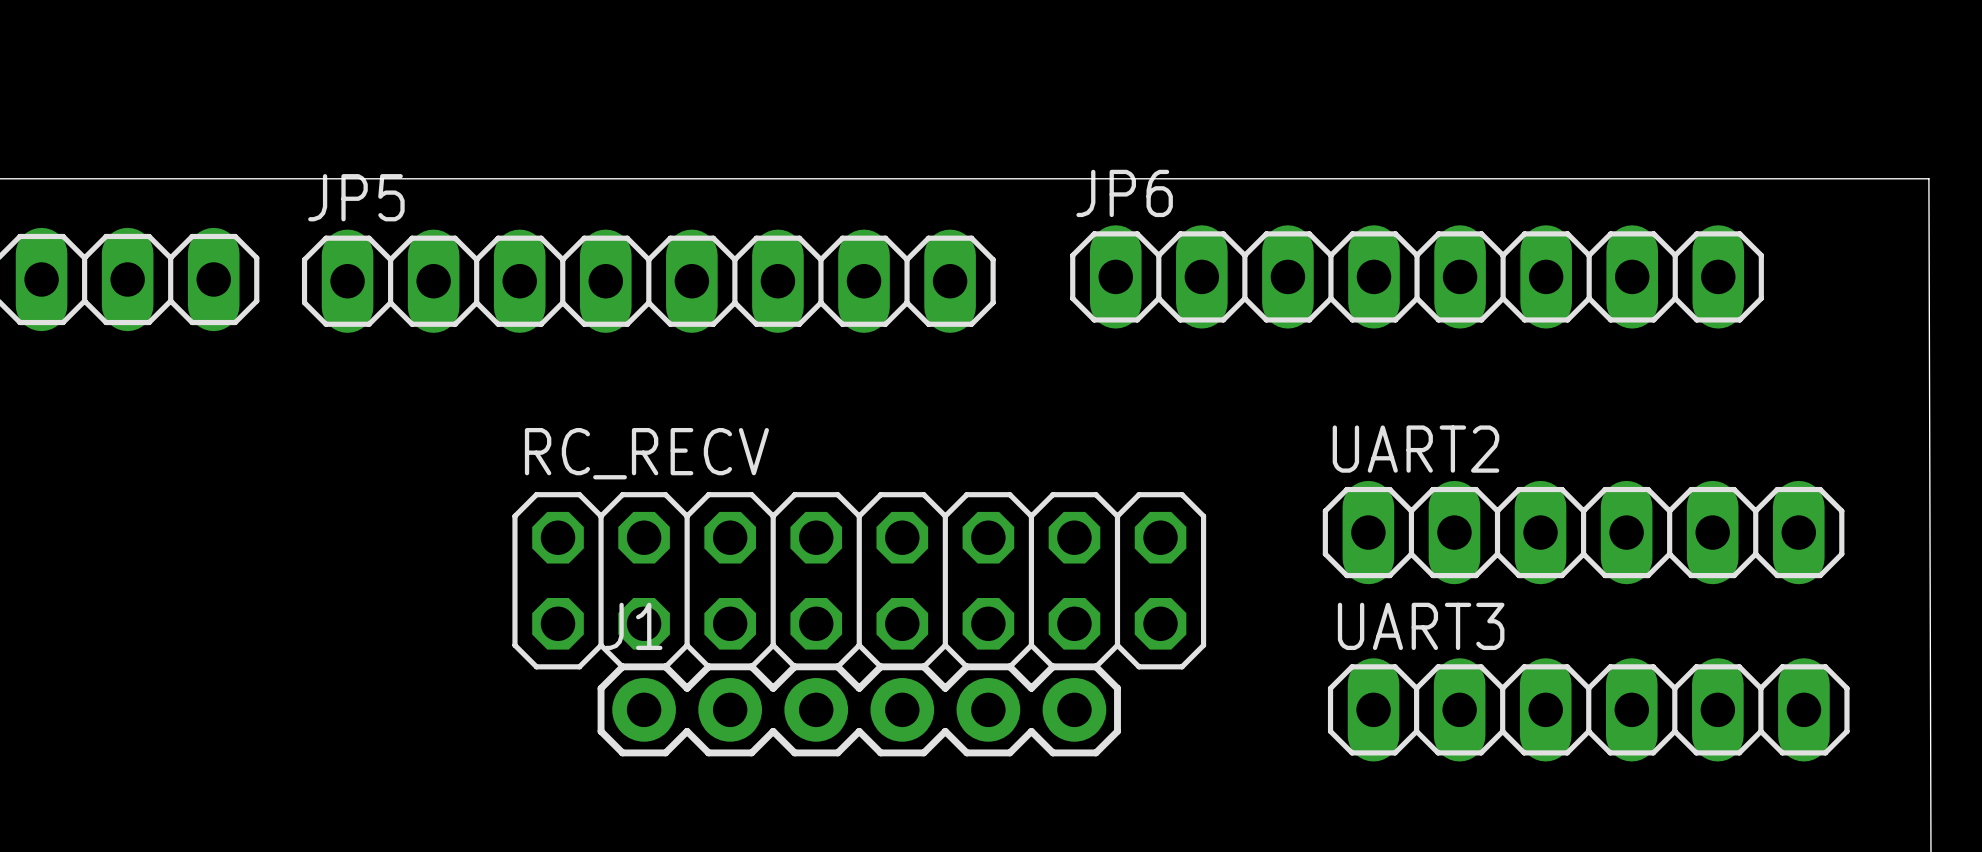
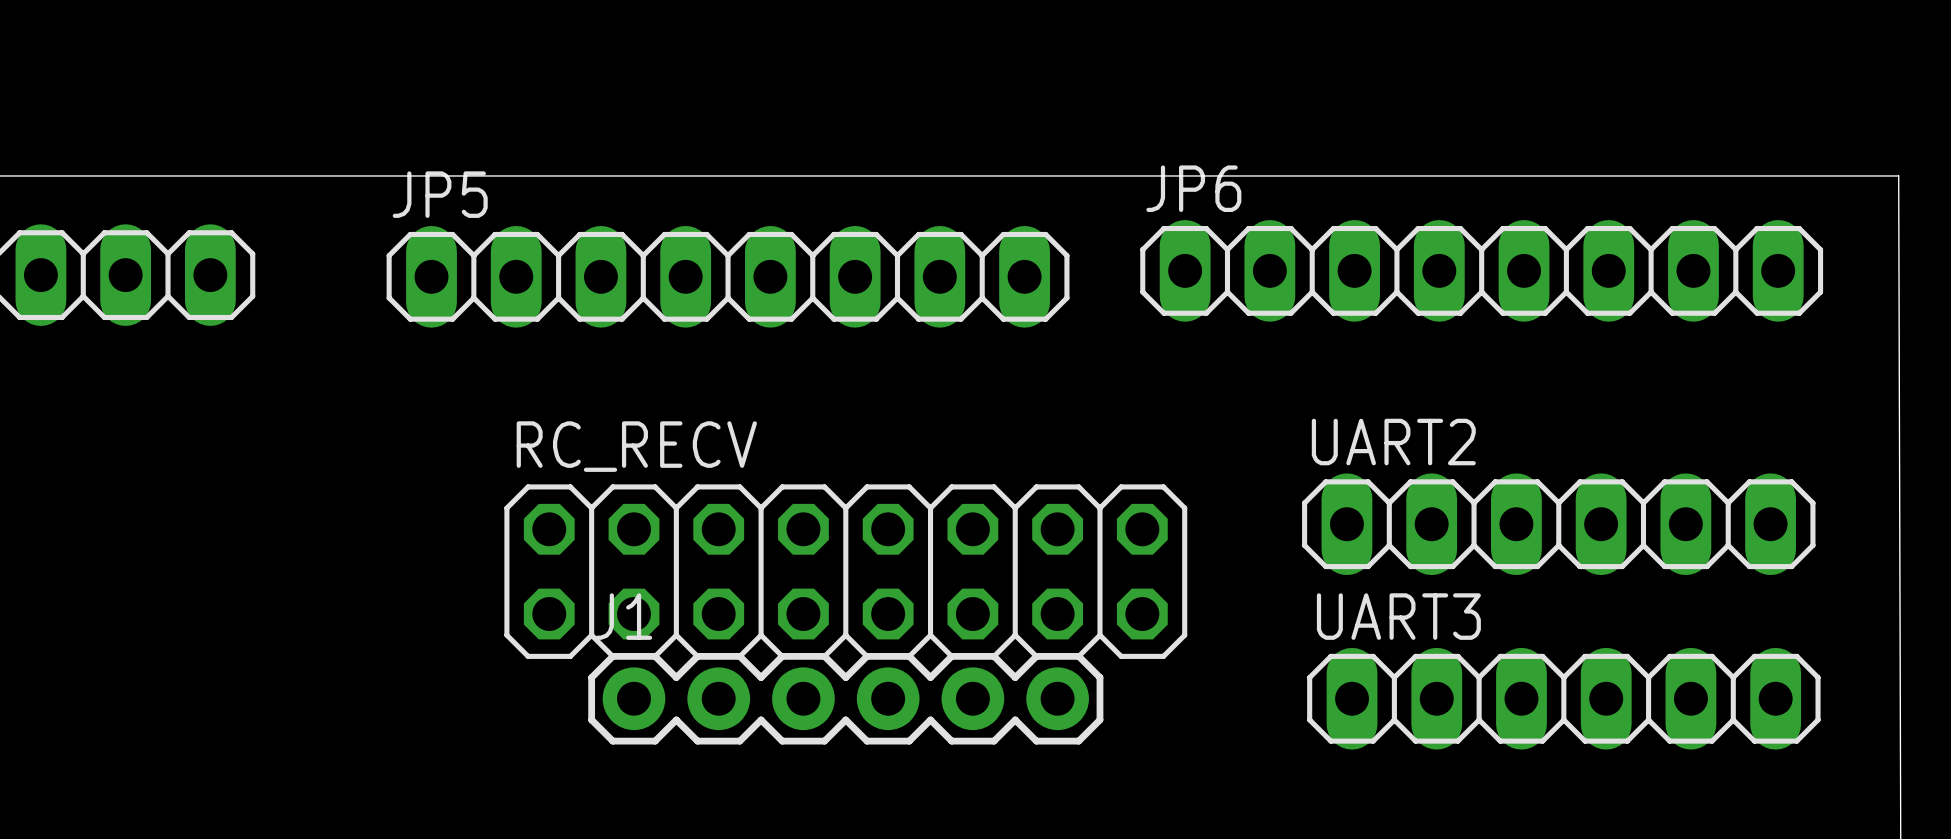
JP6 position: (1417, 276) -> (1481, 270)
JP5 position: (648, 281) -> (728, 276)

